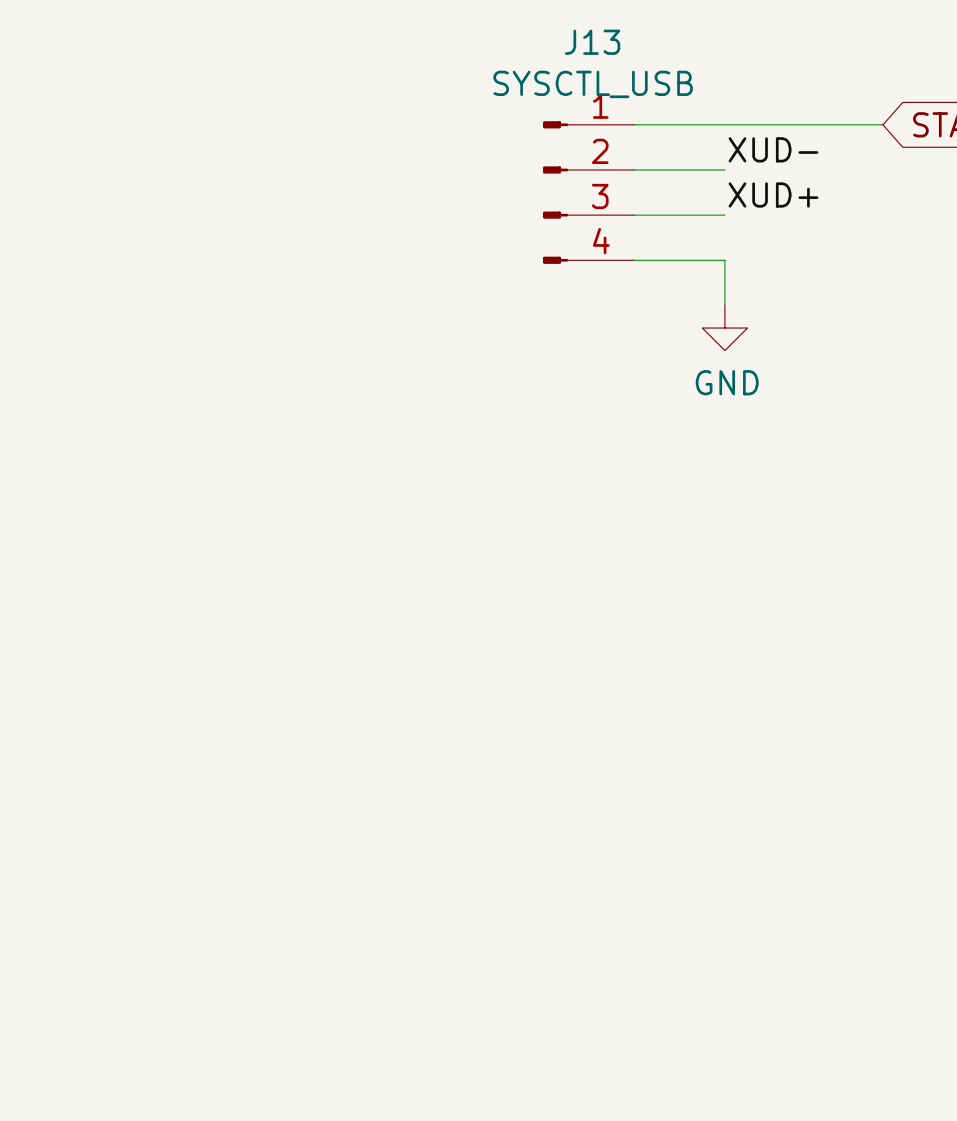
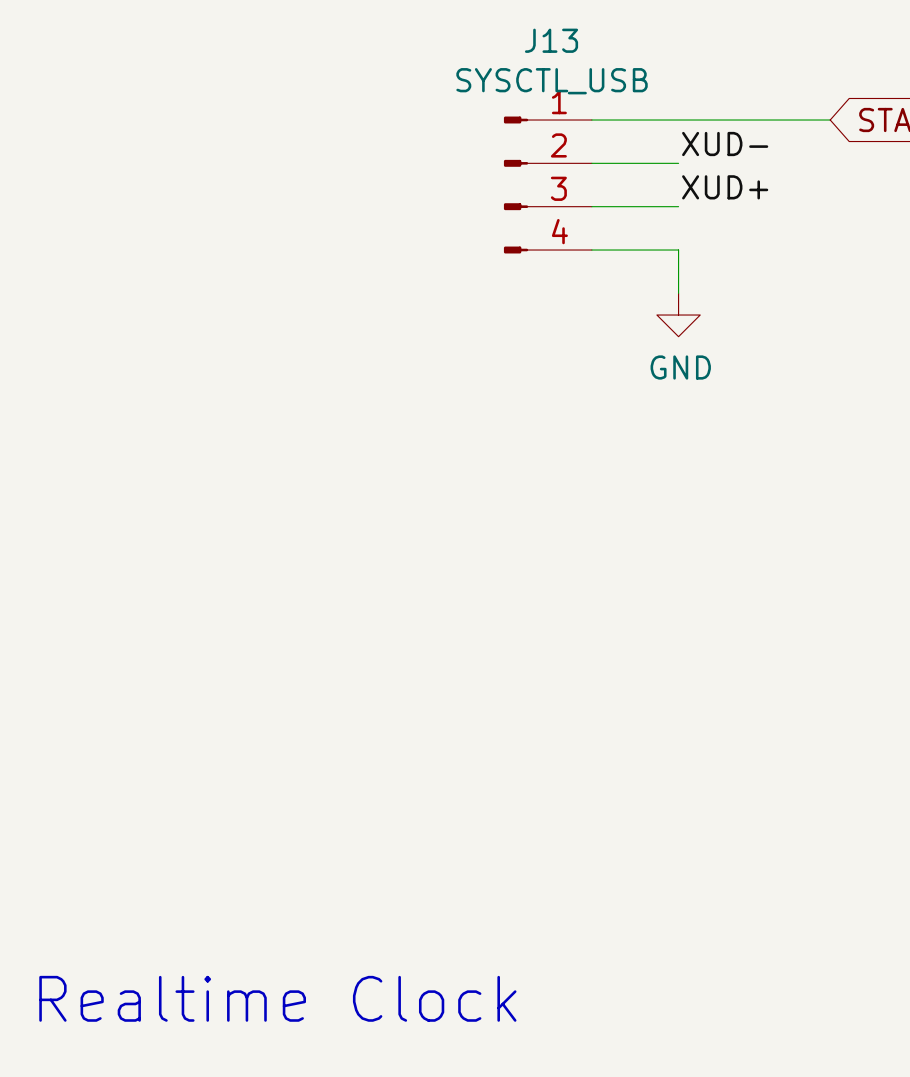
text: none -> Realtime Clock (277, 998)

